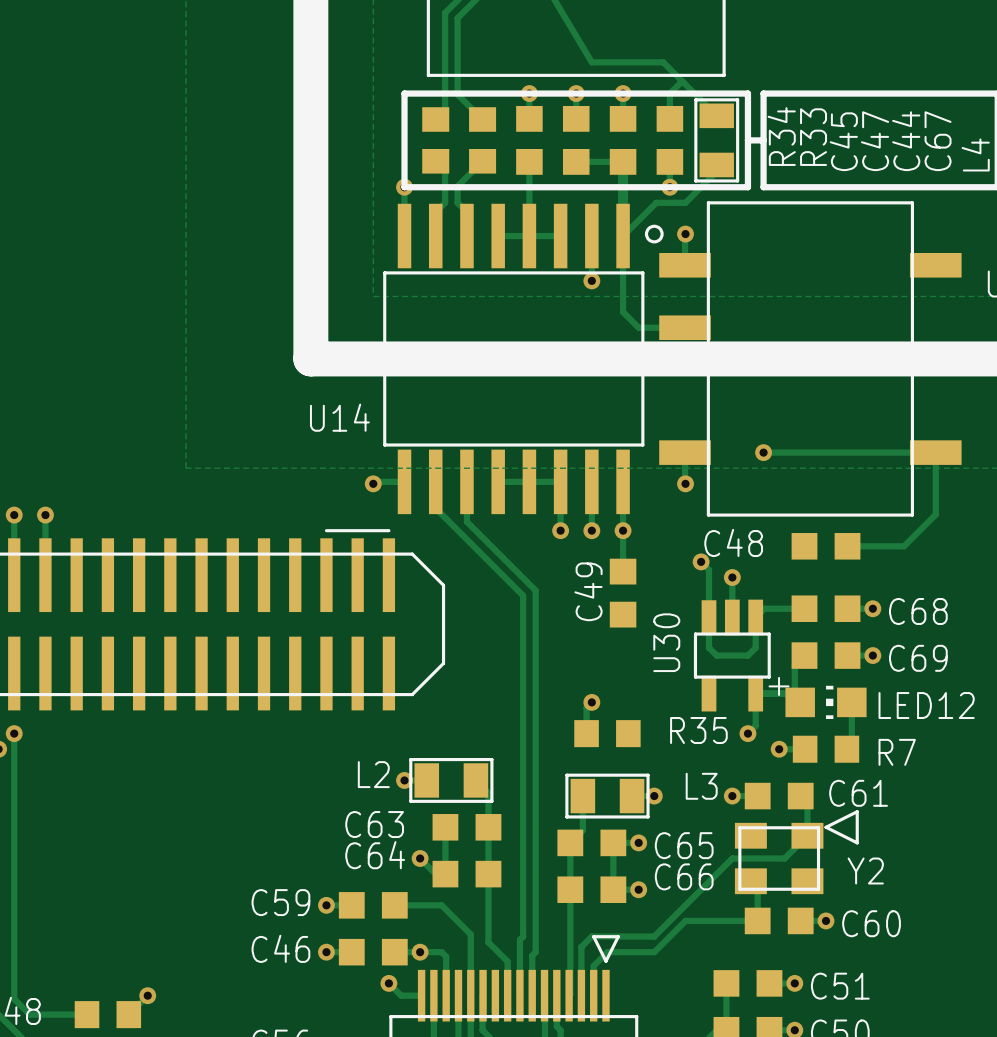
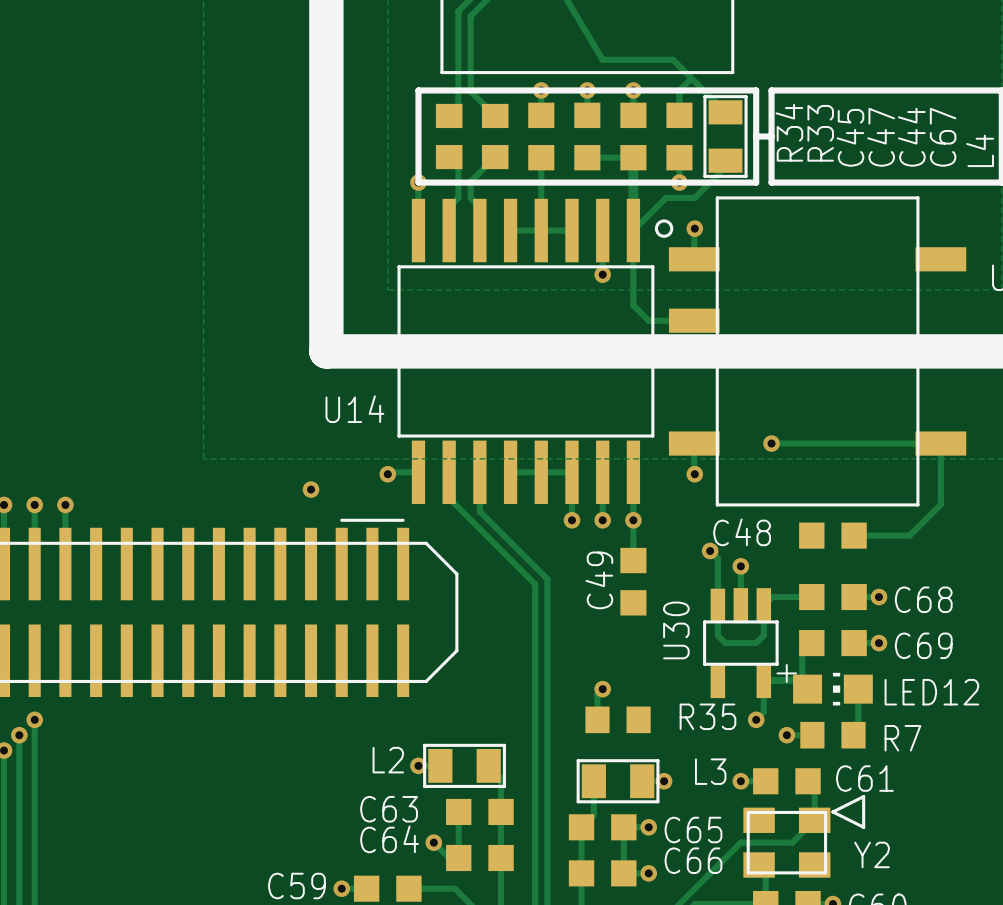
via: none -> (311, 489)

